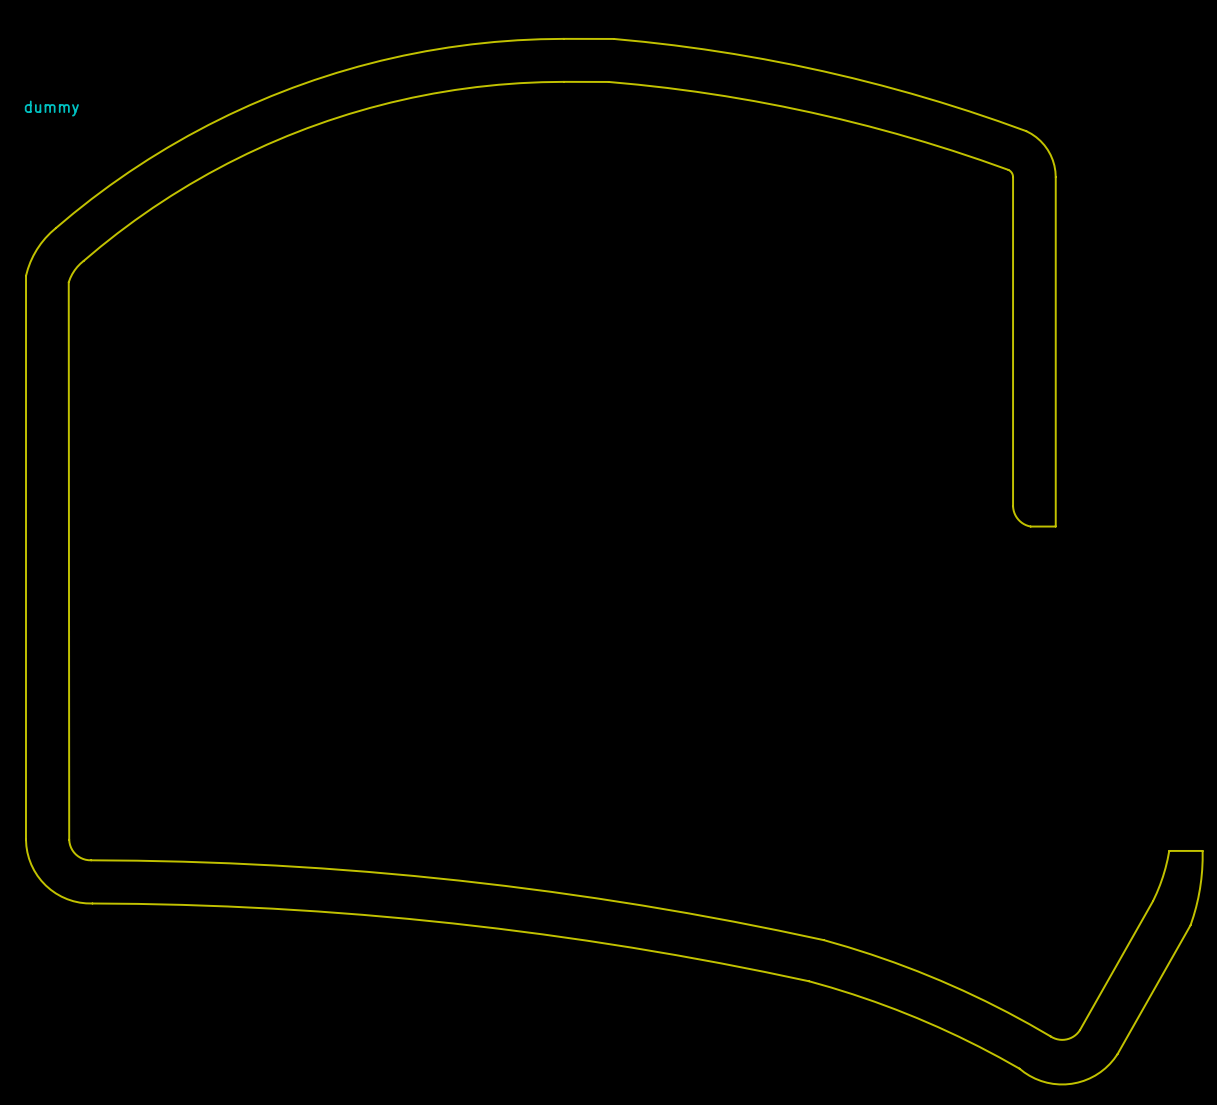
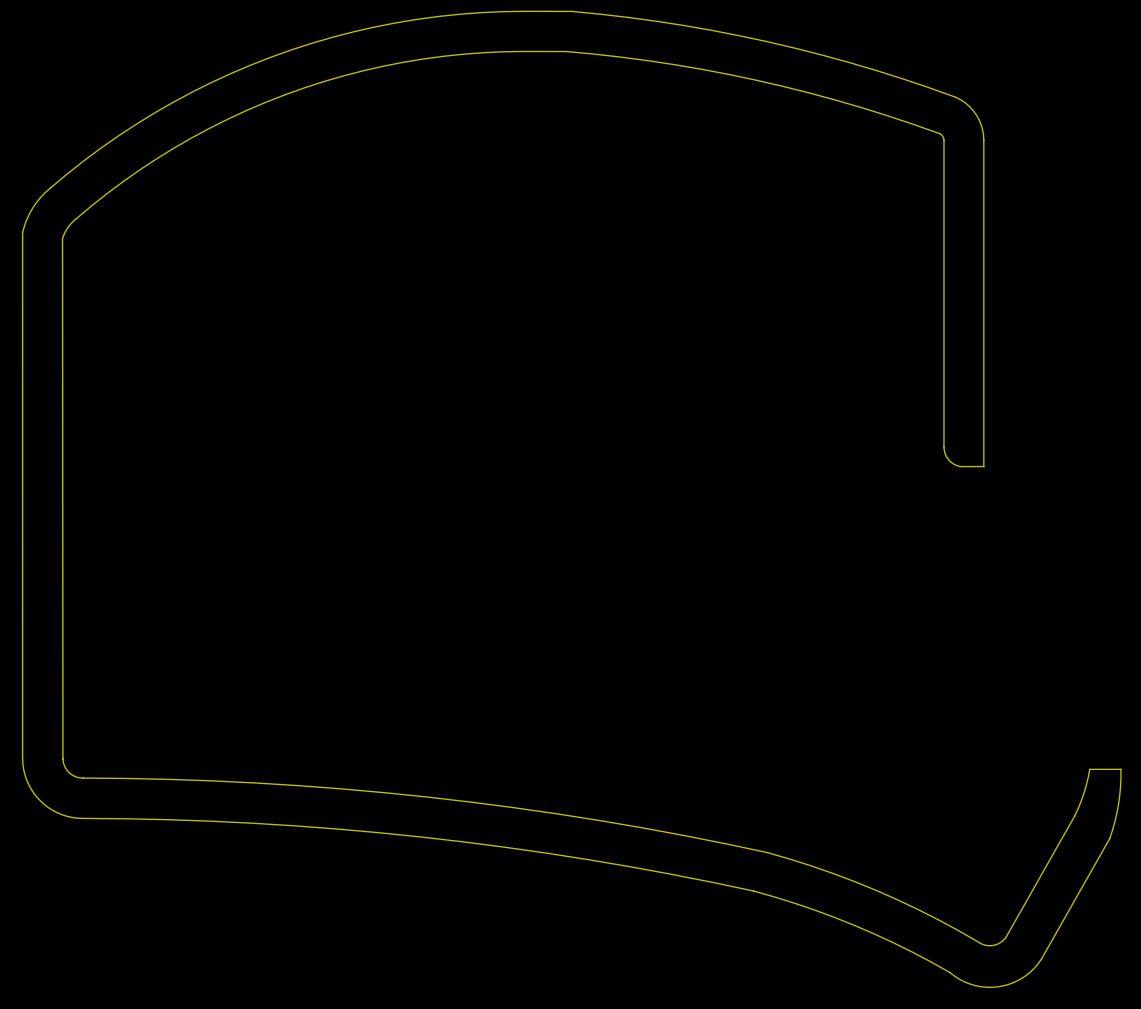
dummy: (51, 108) -> none

